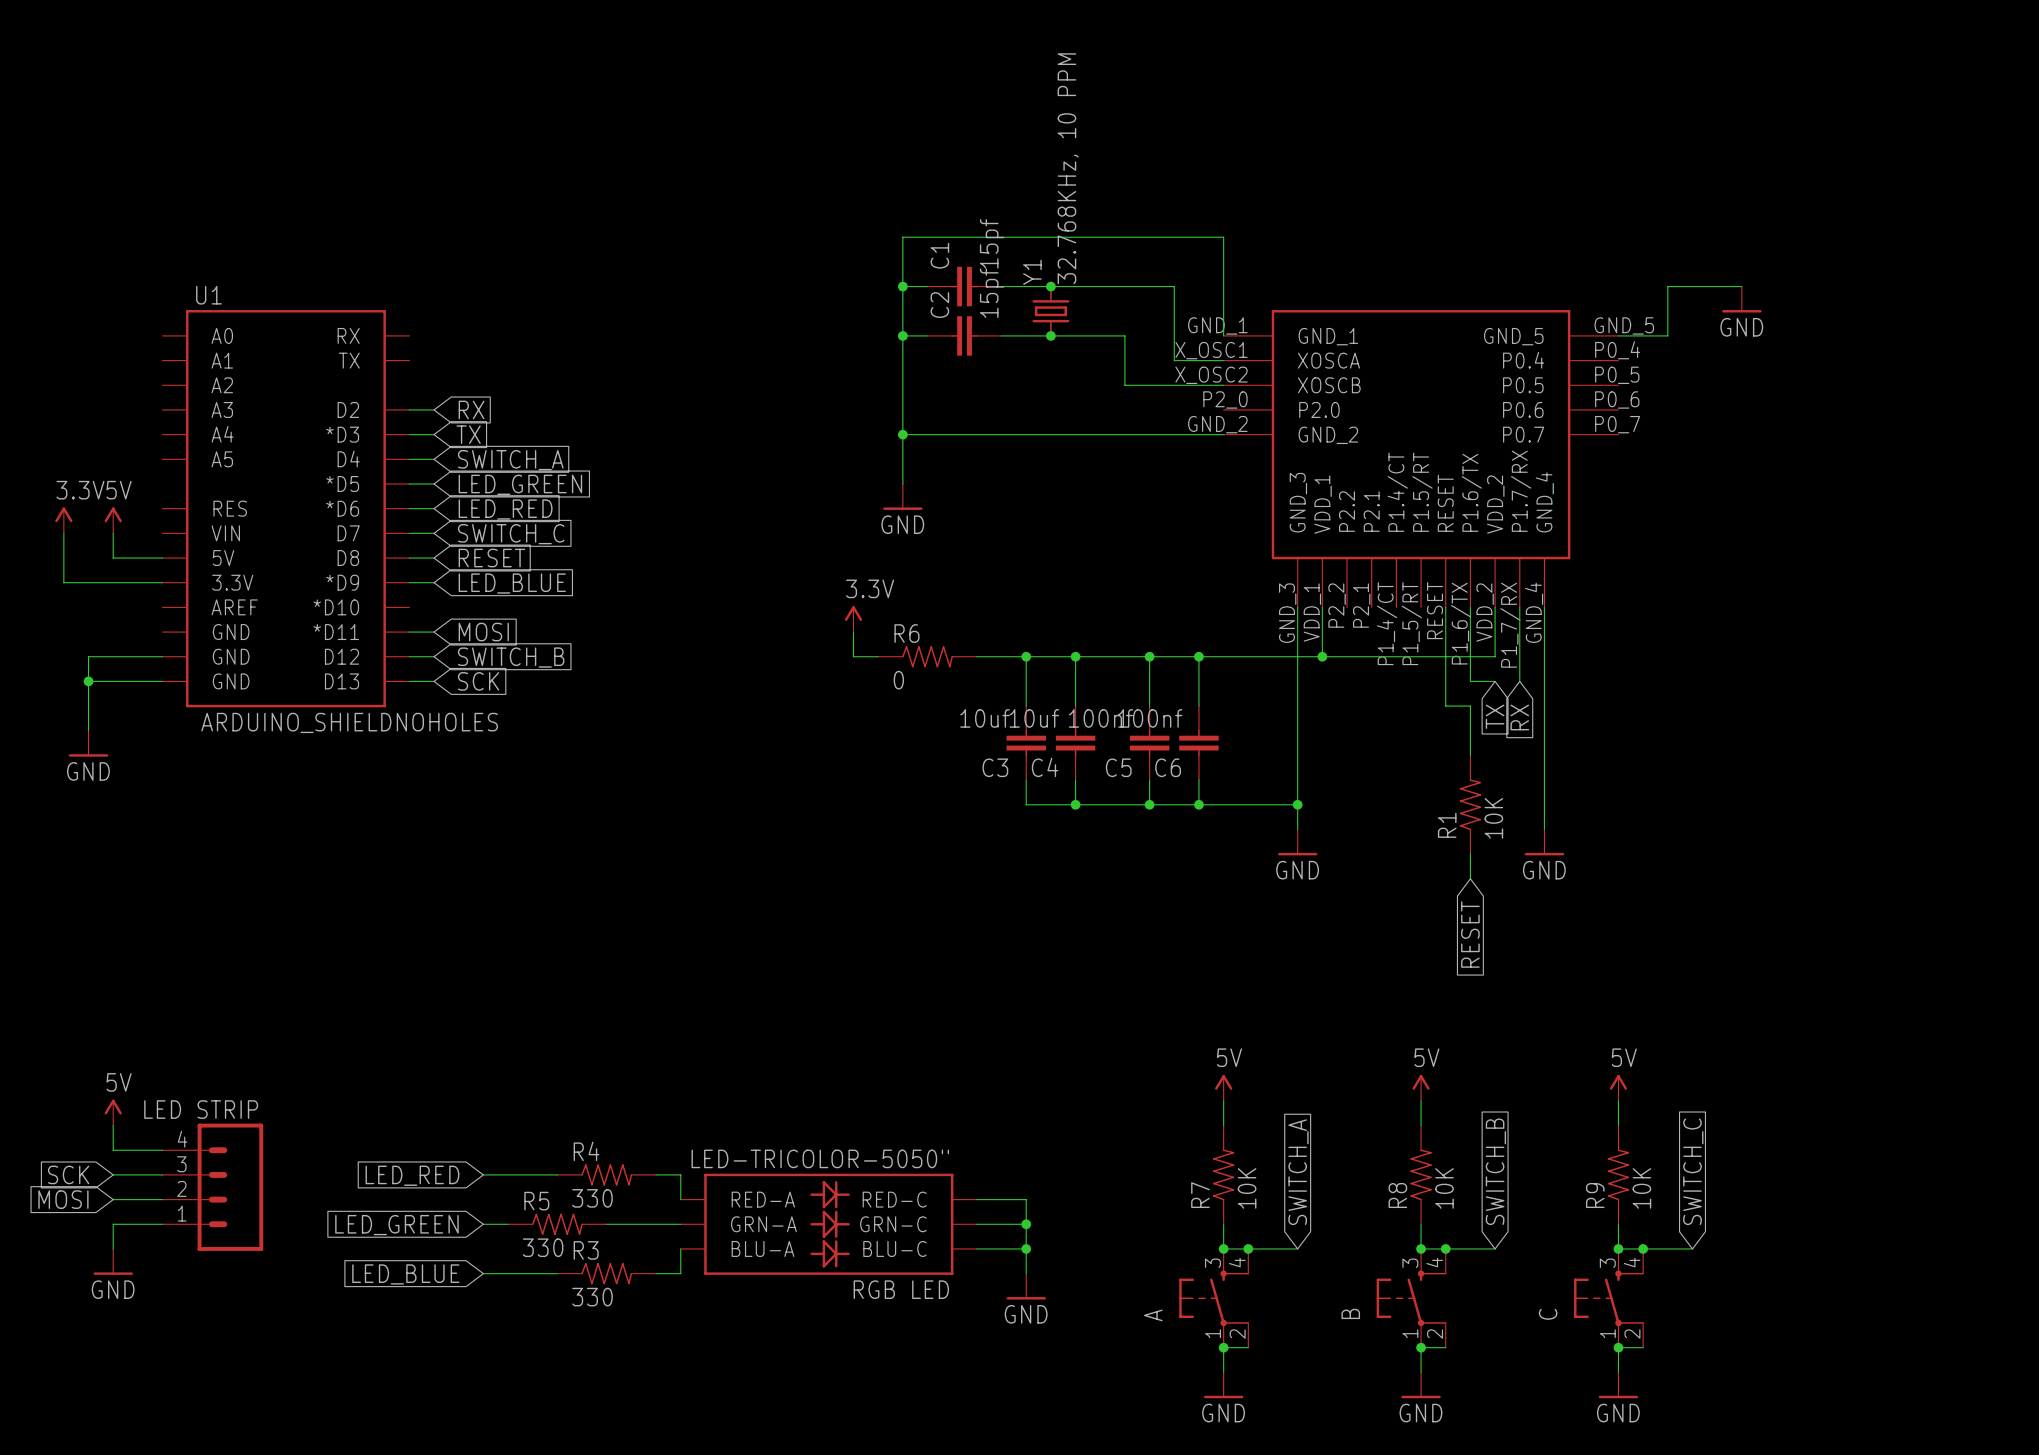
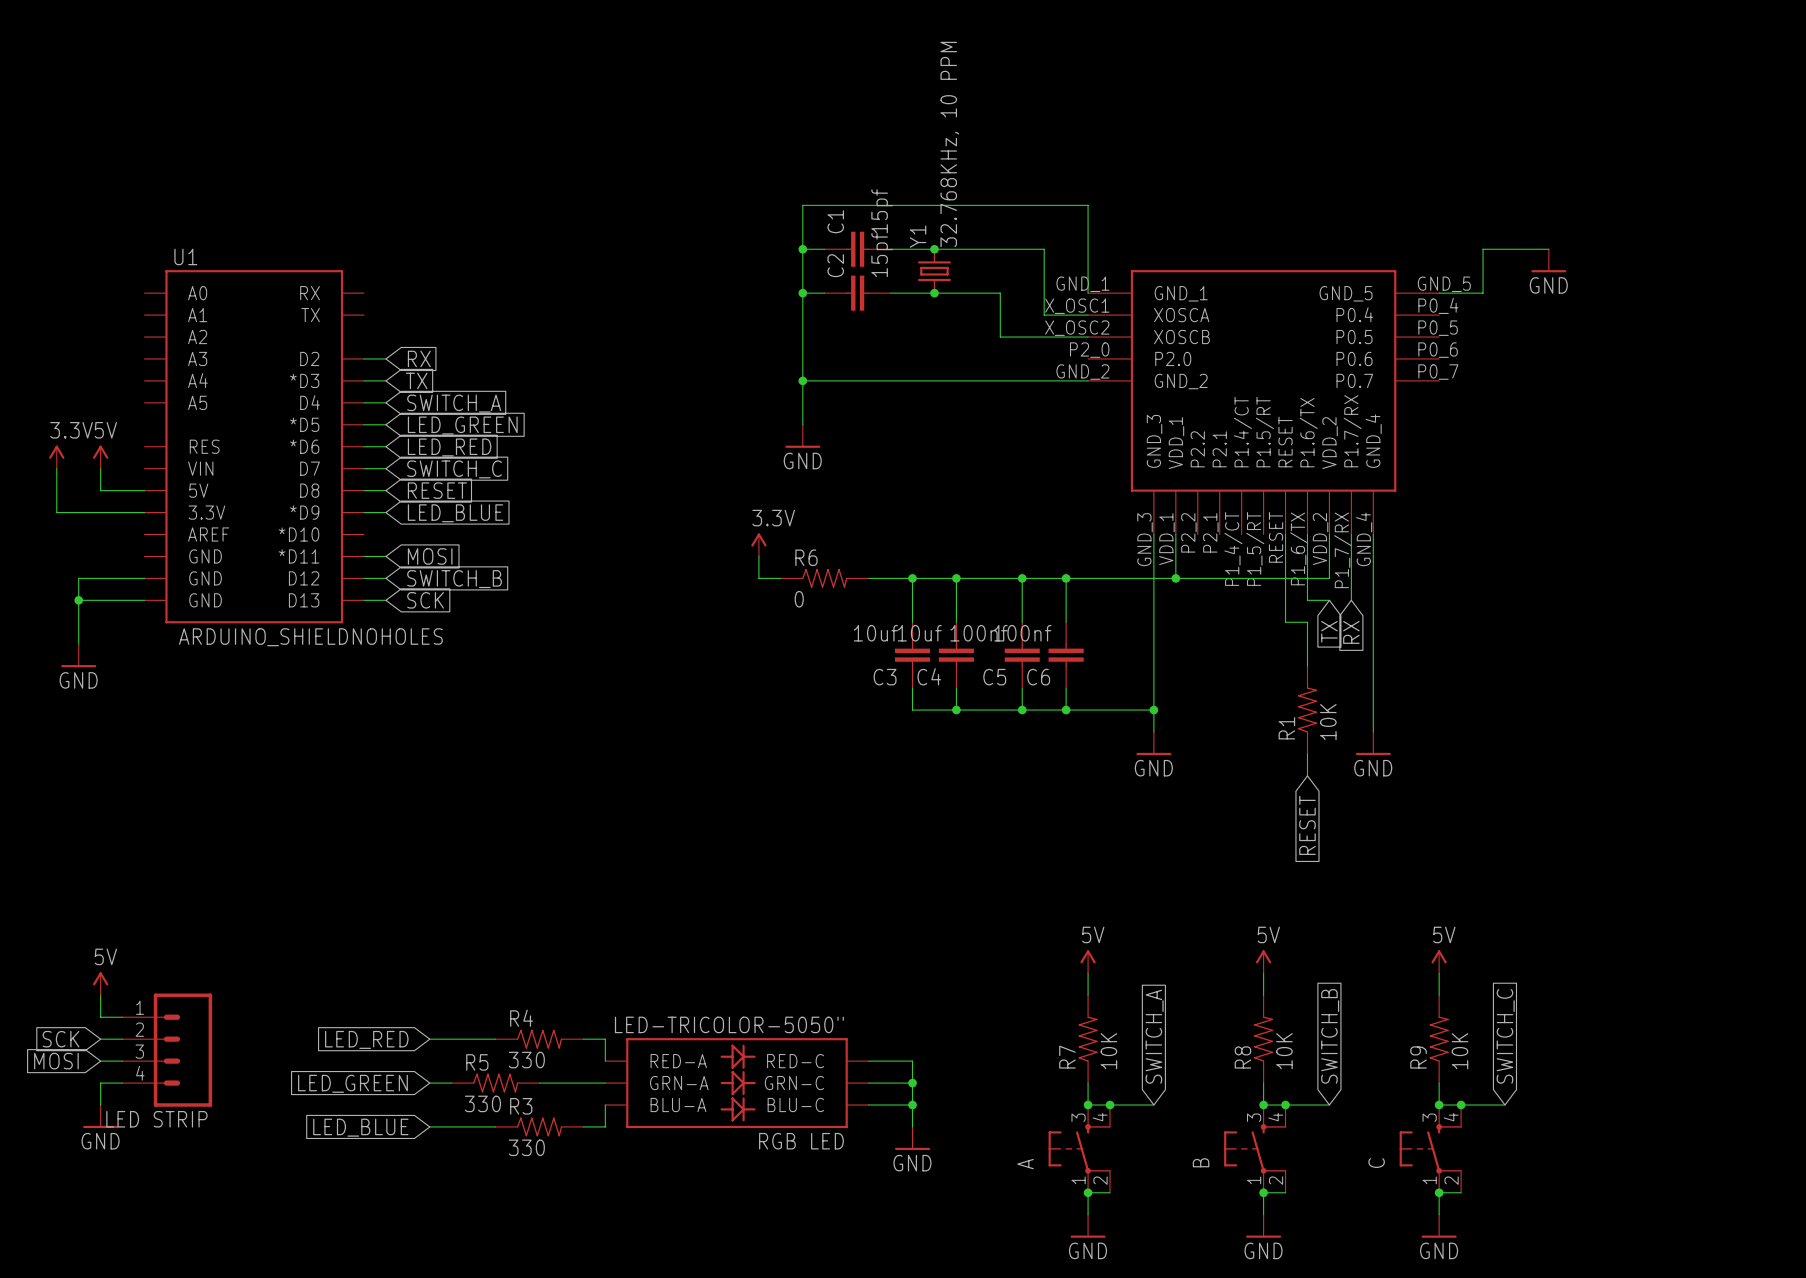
LED STRIP: none -> (167, 1050)
LED STRIP: (212, 1187) -> none

